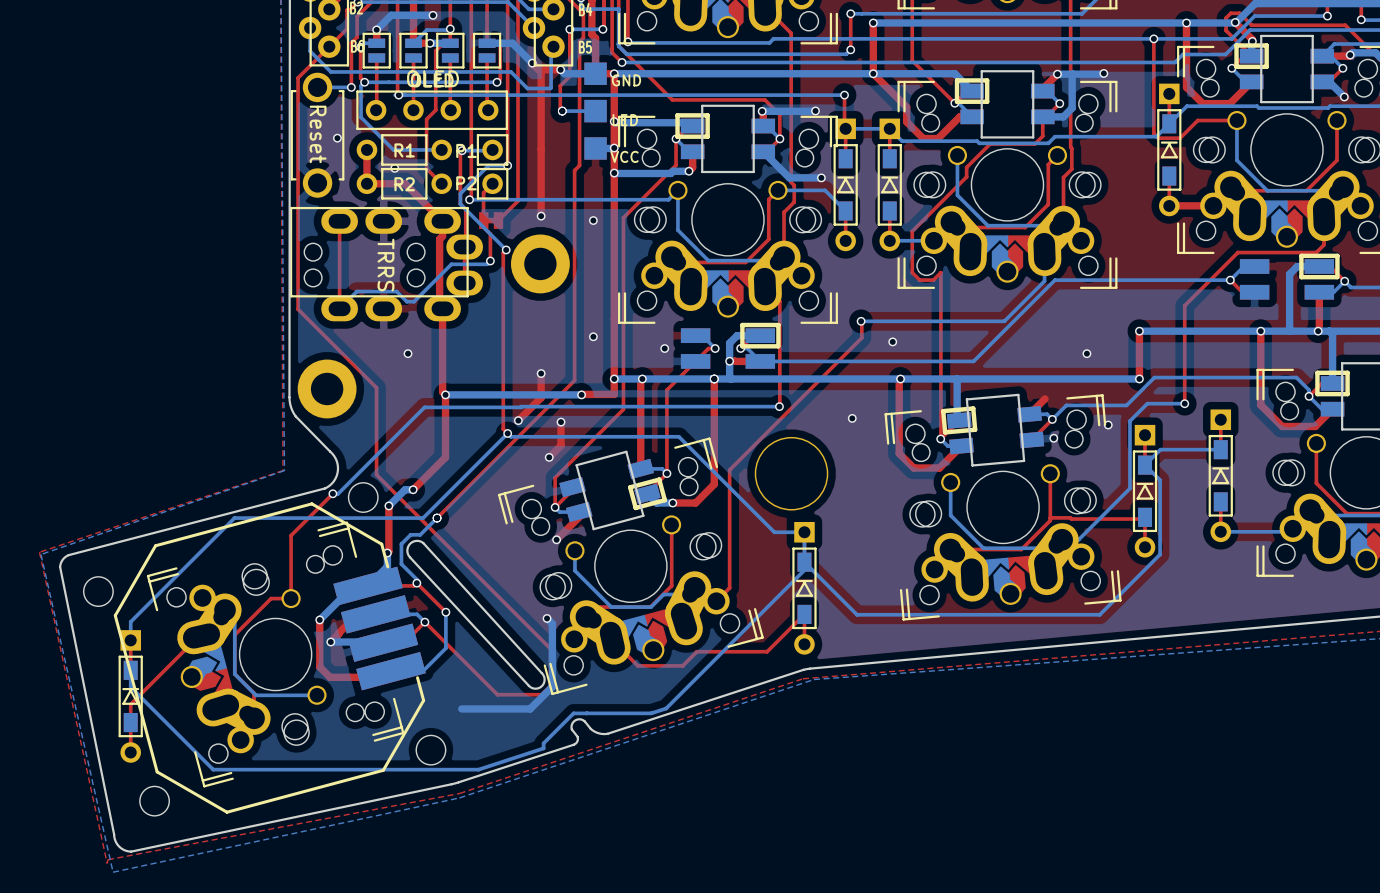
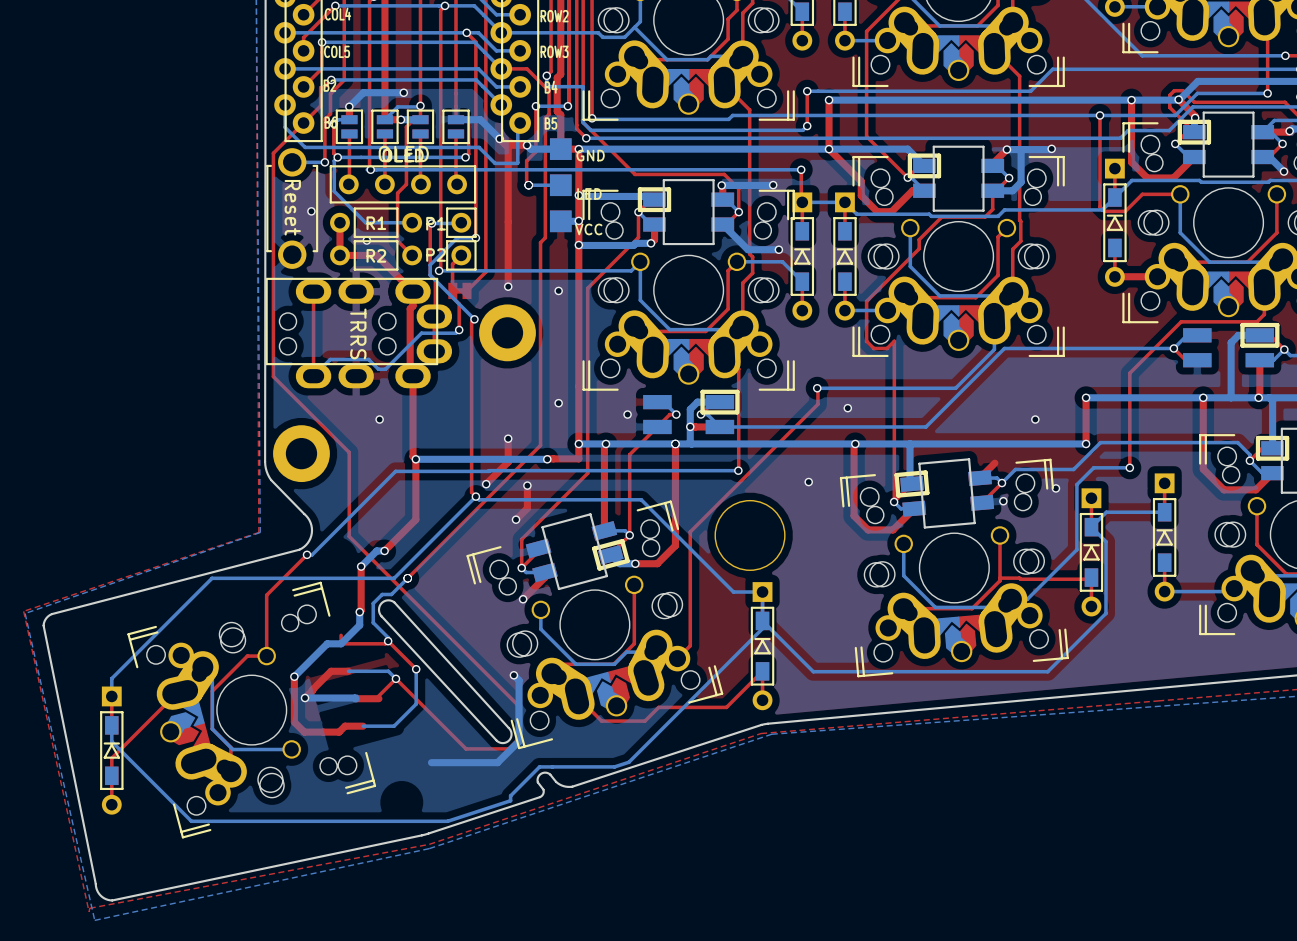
part: (264, 649) -> none

